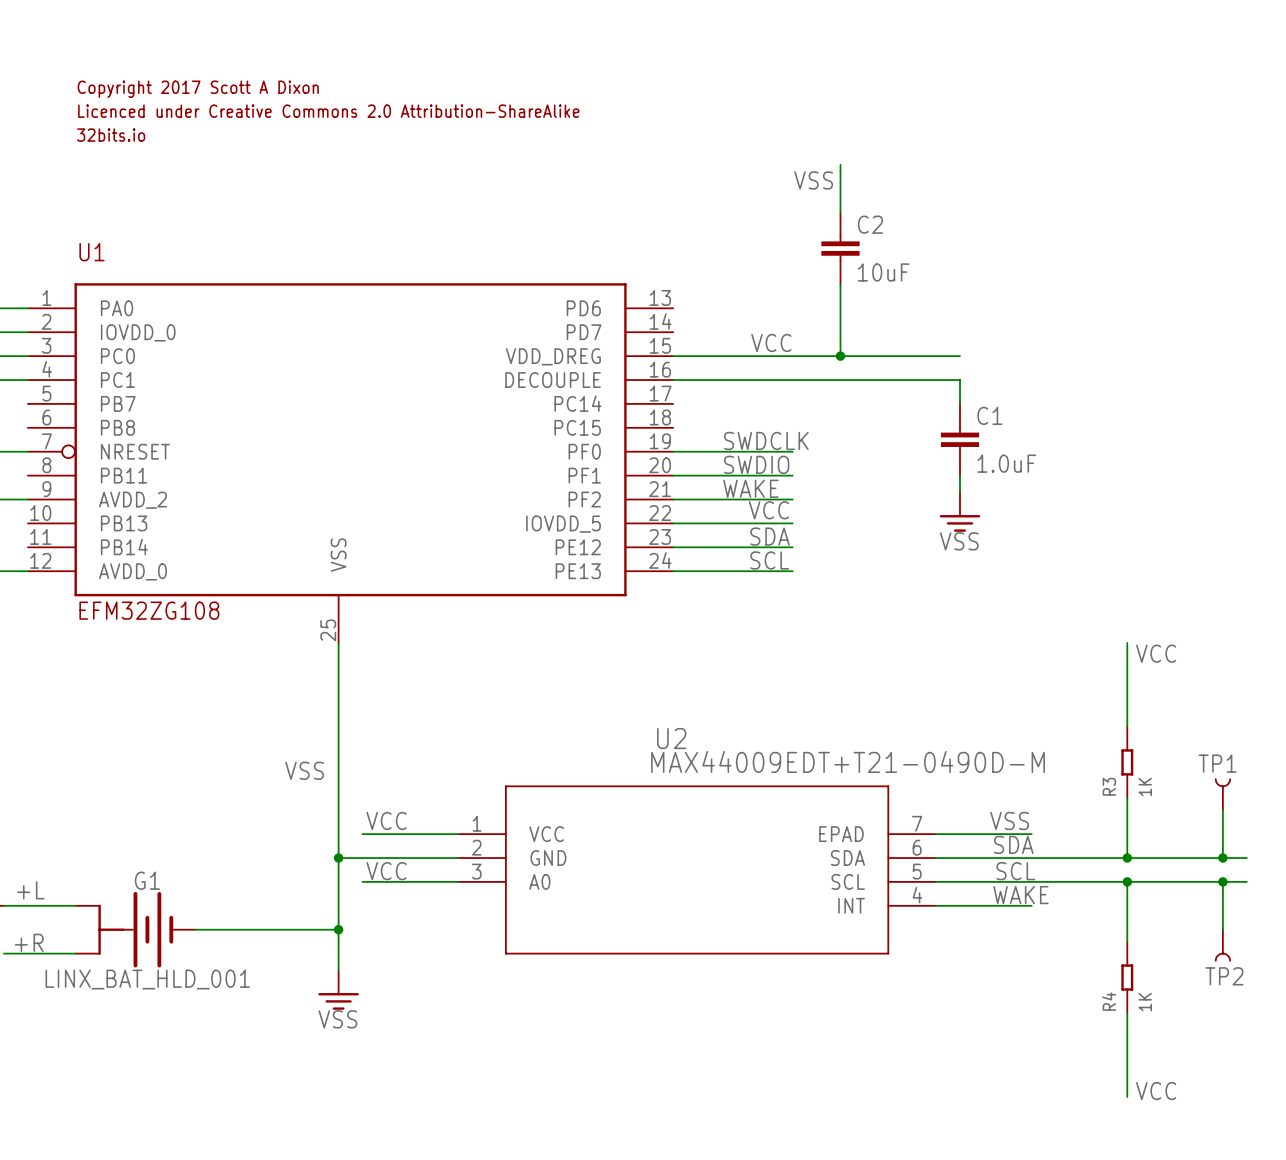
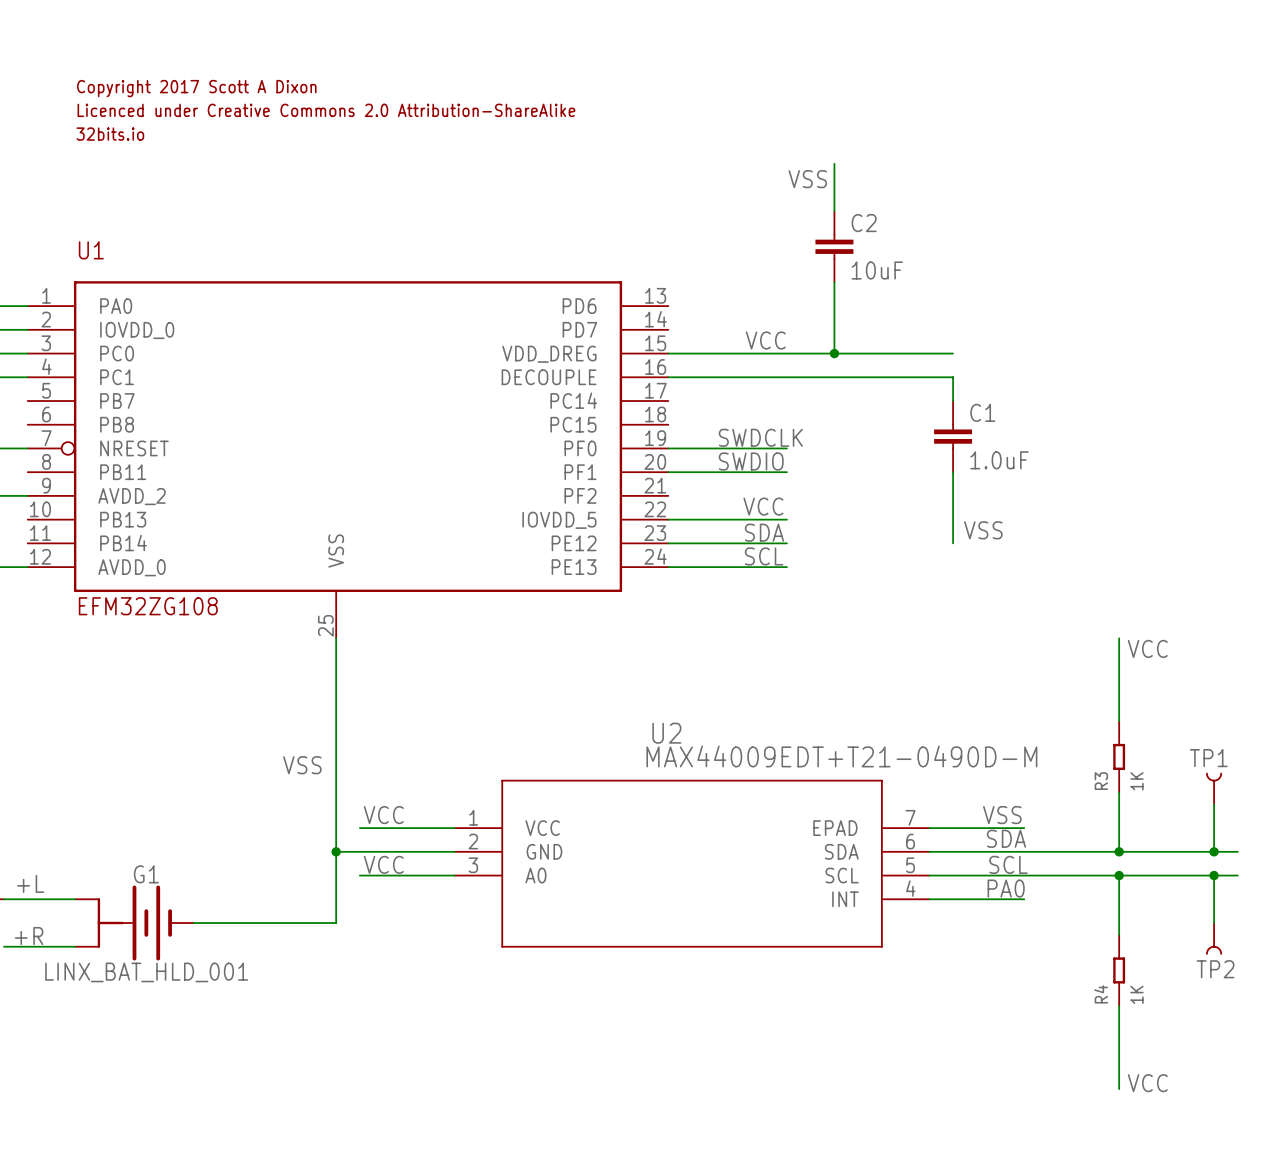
label: WAKE (750, 488) -> none
wire: (673, 499) (792, 499) -> none
power symbol: VSS (960, 512) -> none
label: none -> VSS (983, 530)
label: WAKE (1020, 895) -> PA0 (1006, 888)
wire: (338, 929) (338, 970) -> none
junction: (338, 929) -> none
power symbol: VSS (338, 990) -> none

